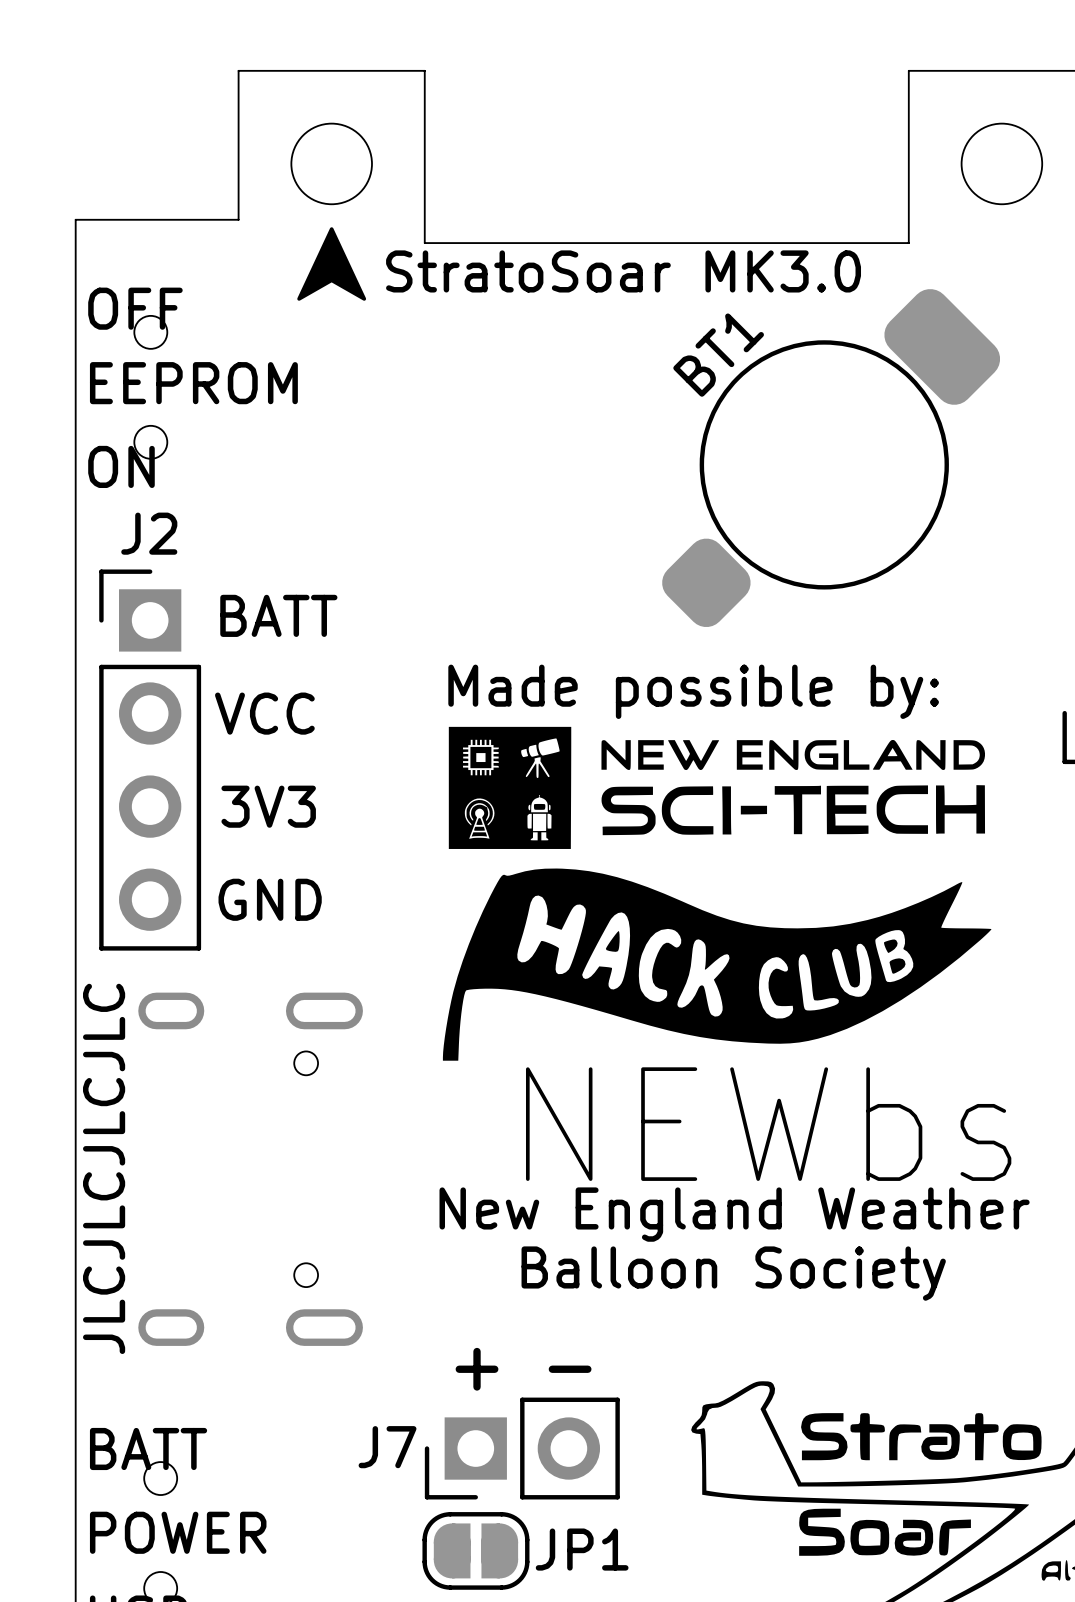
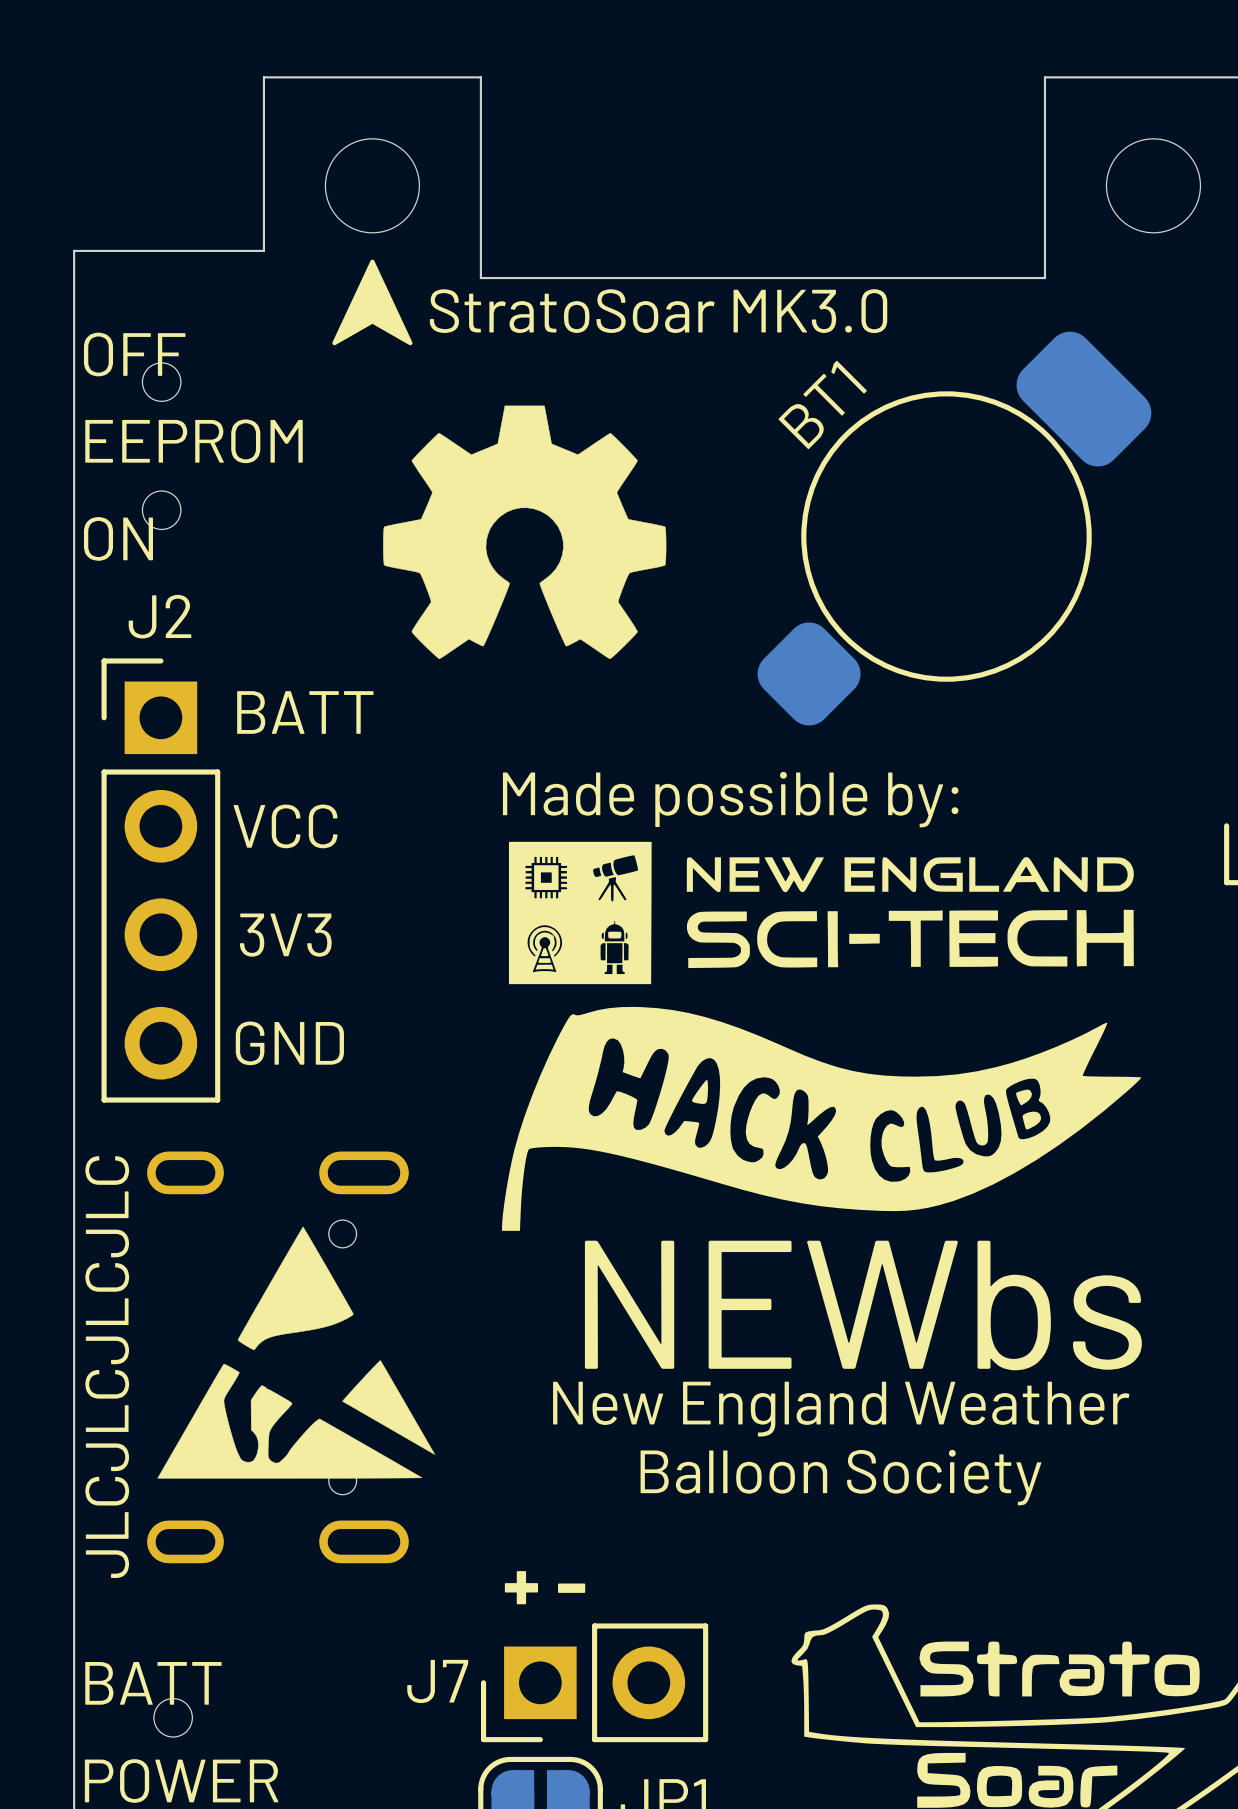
drawing: none -> [383, 405, 667, 660]
drawing: none -> [157, 1226, 435, 1479]

